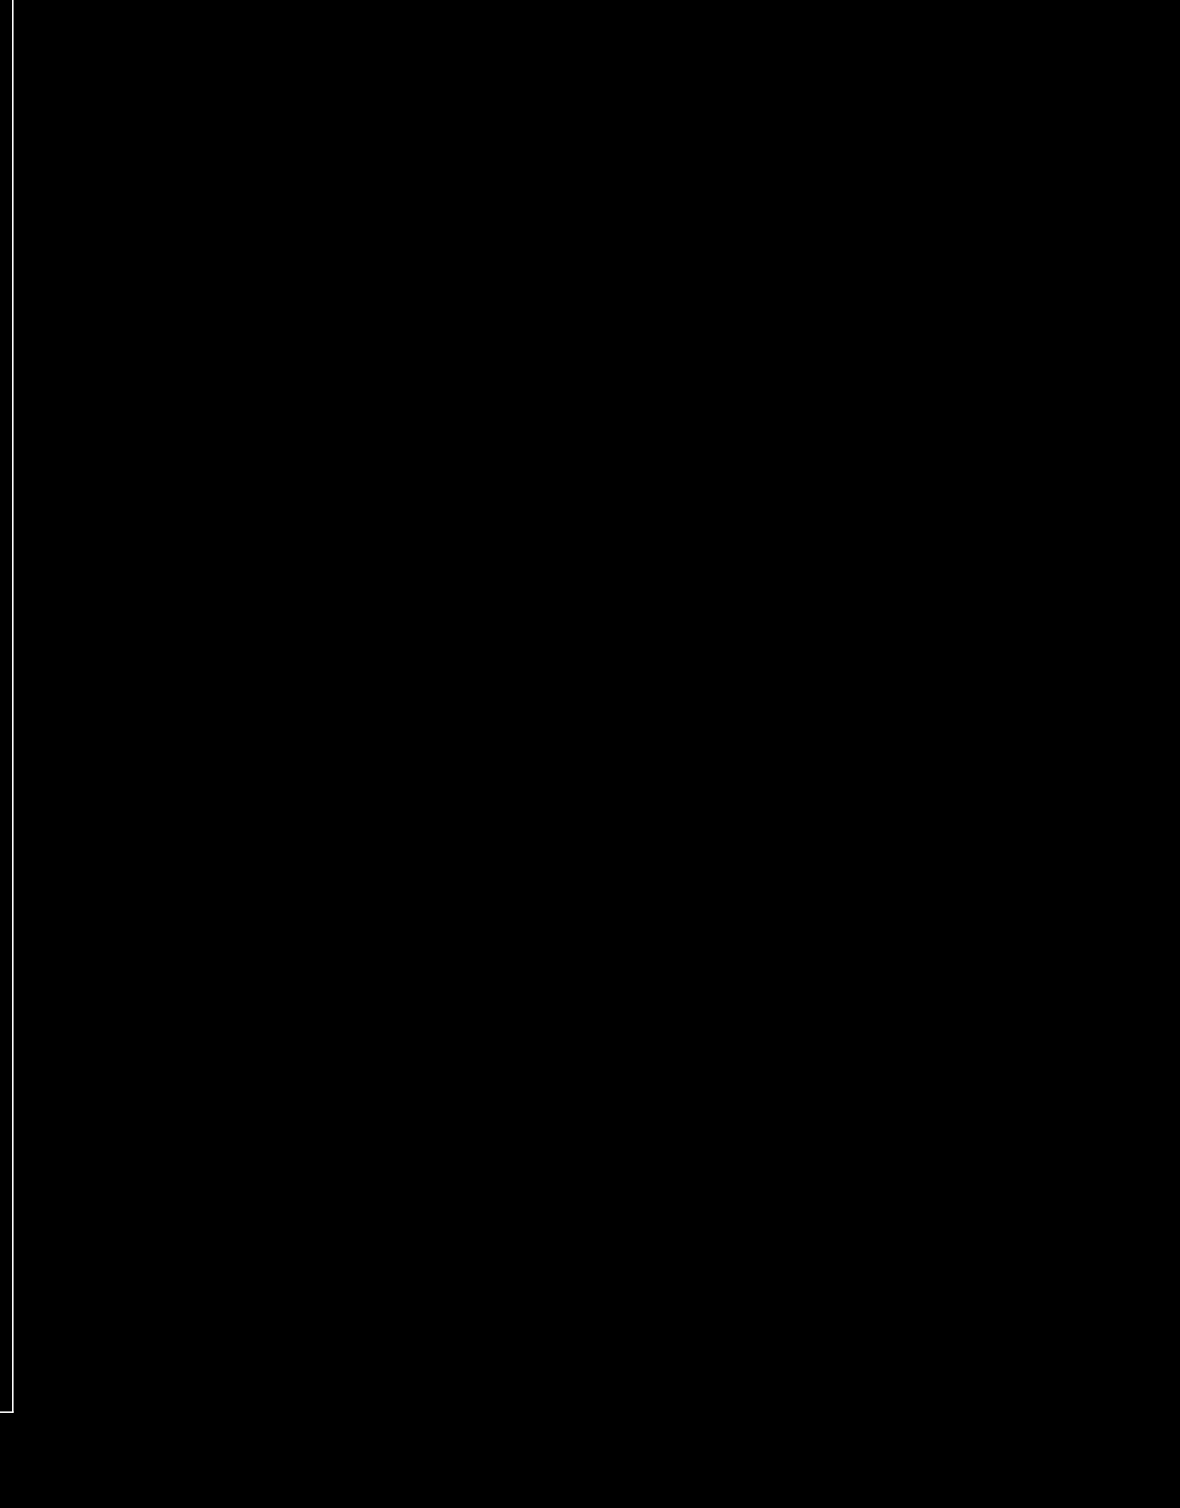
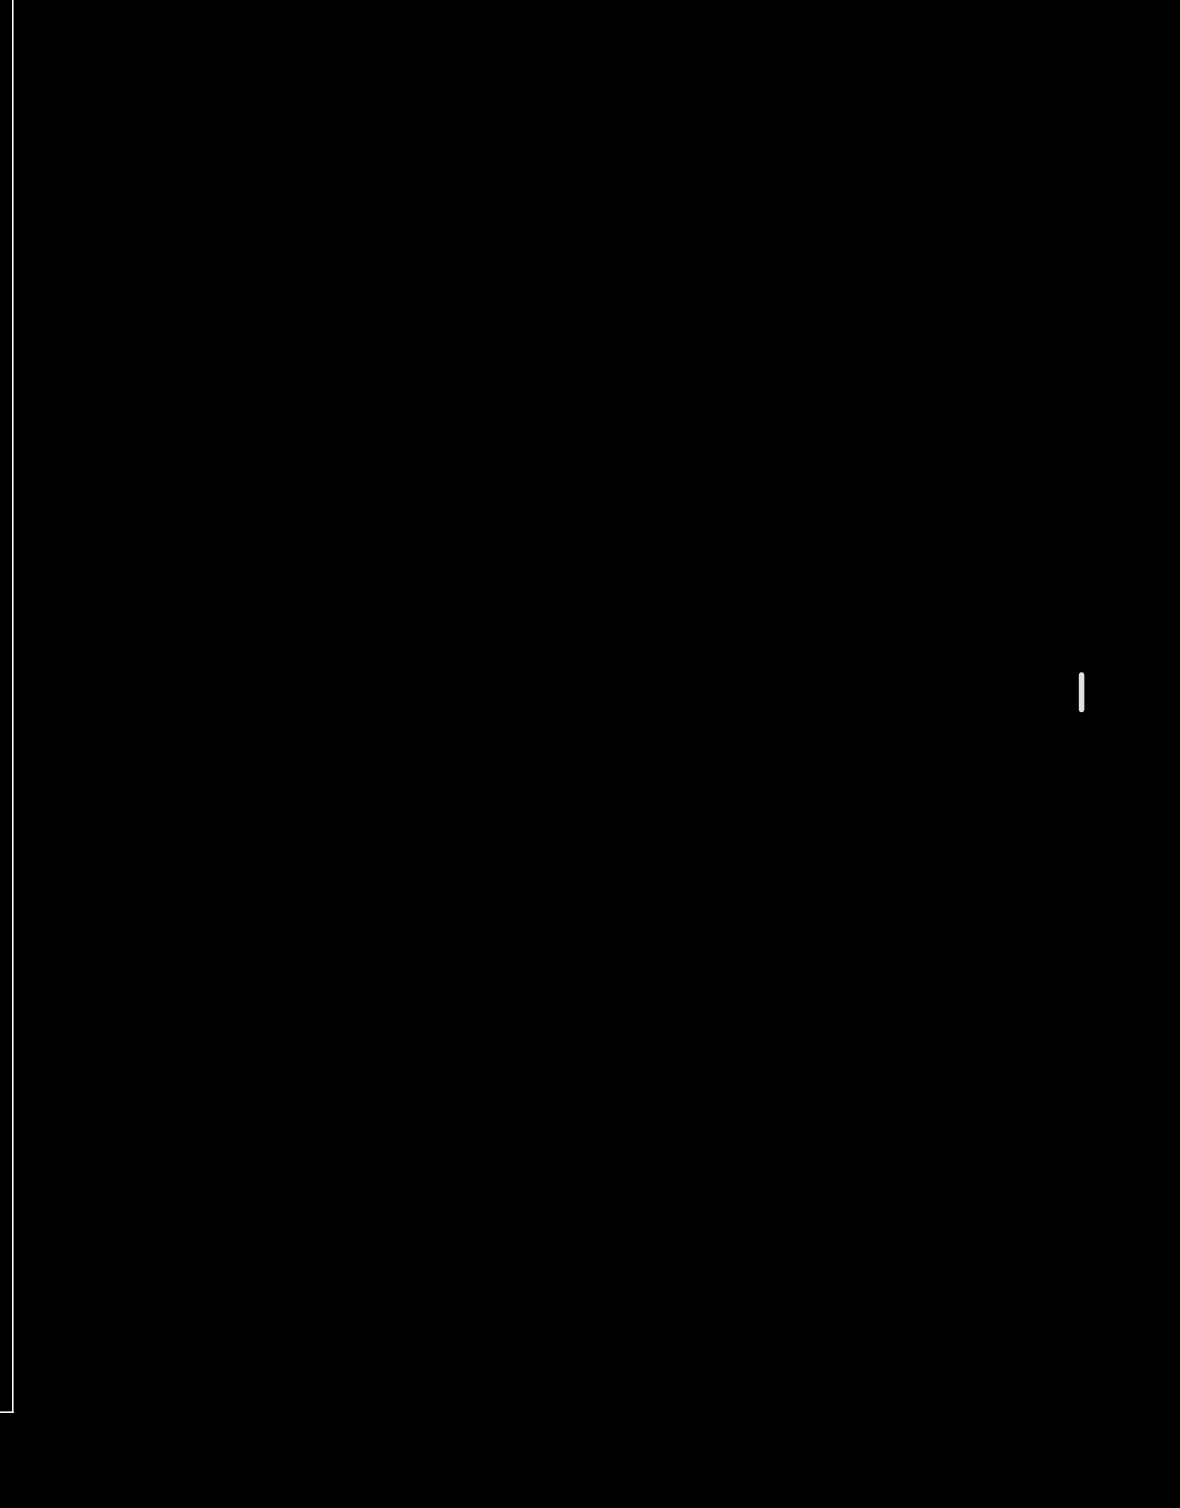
part: none -> (1081, 692)

